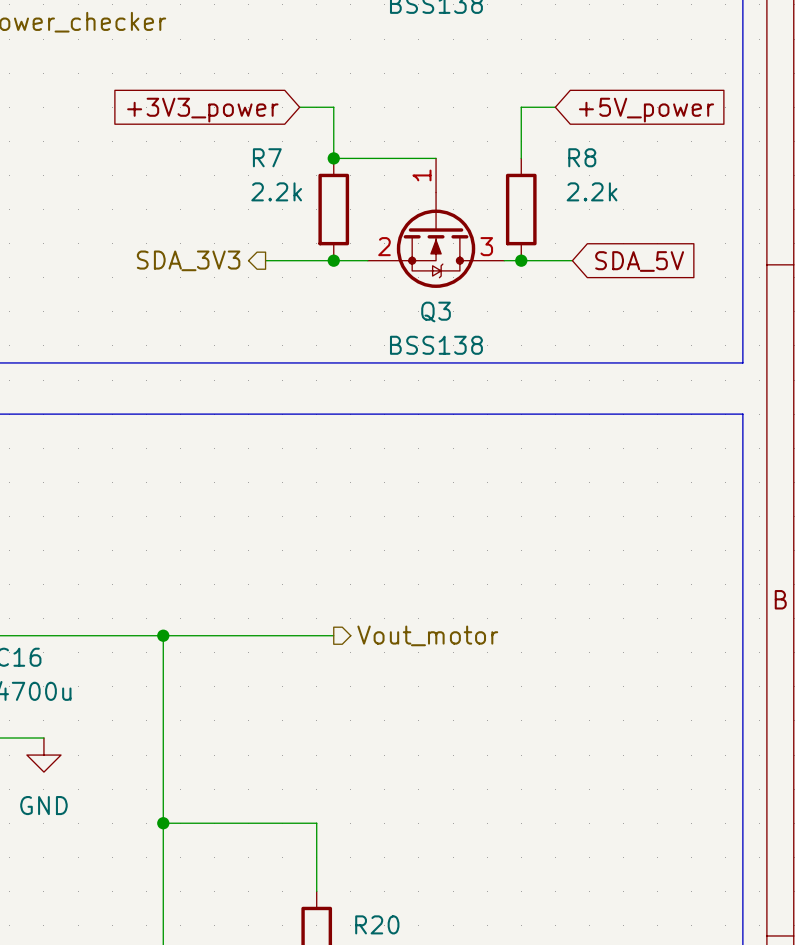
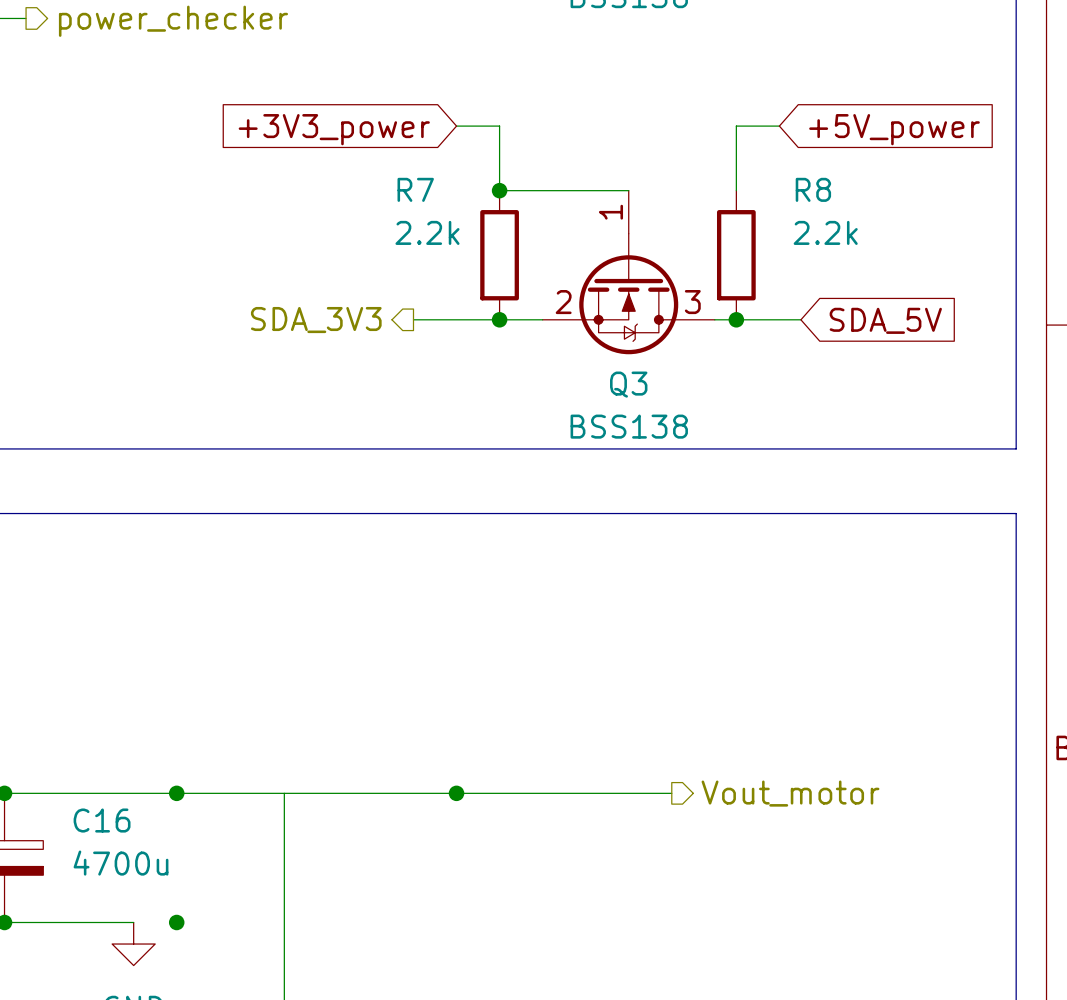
junction: none -> (176, 793)
junction: (163, 635) -> none
junction: none -> (456, 793)
wire: none -> (499, 793) (671, 793)
hierarchical label position: Vout_motor (427, 635) -> Vout_motor (790, 793)
junction: none -> (176, 922)

